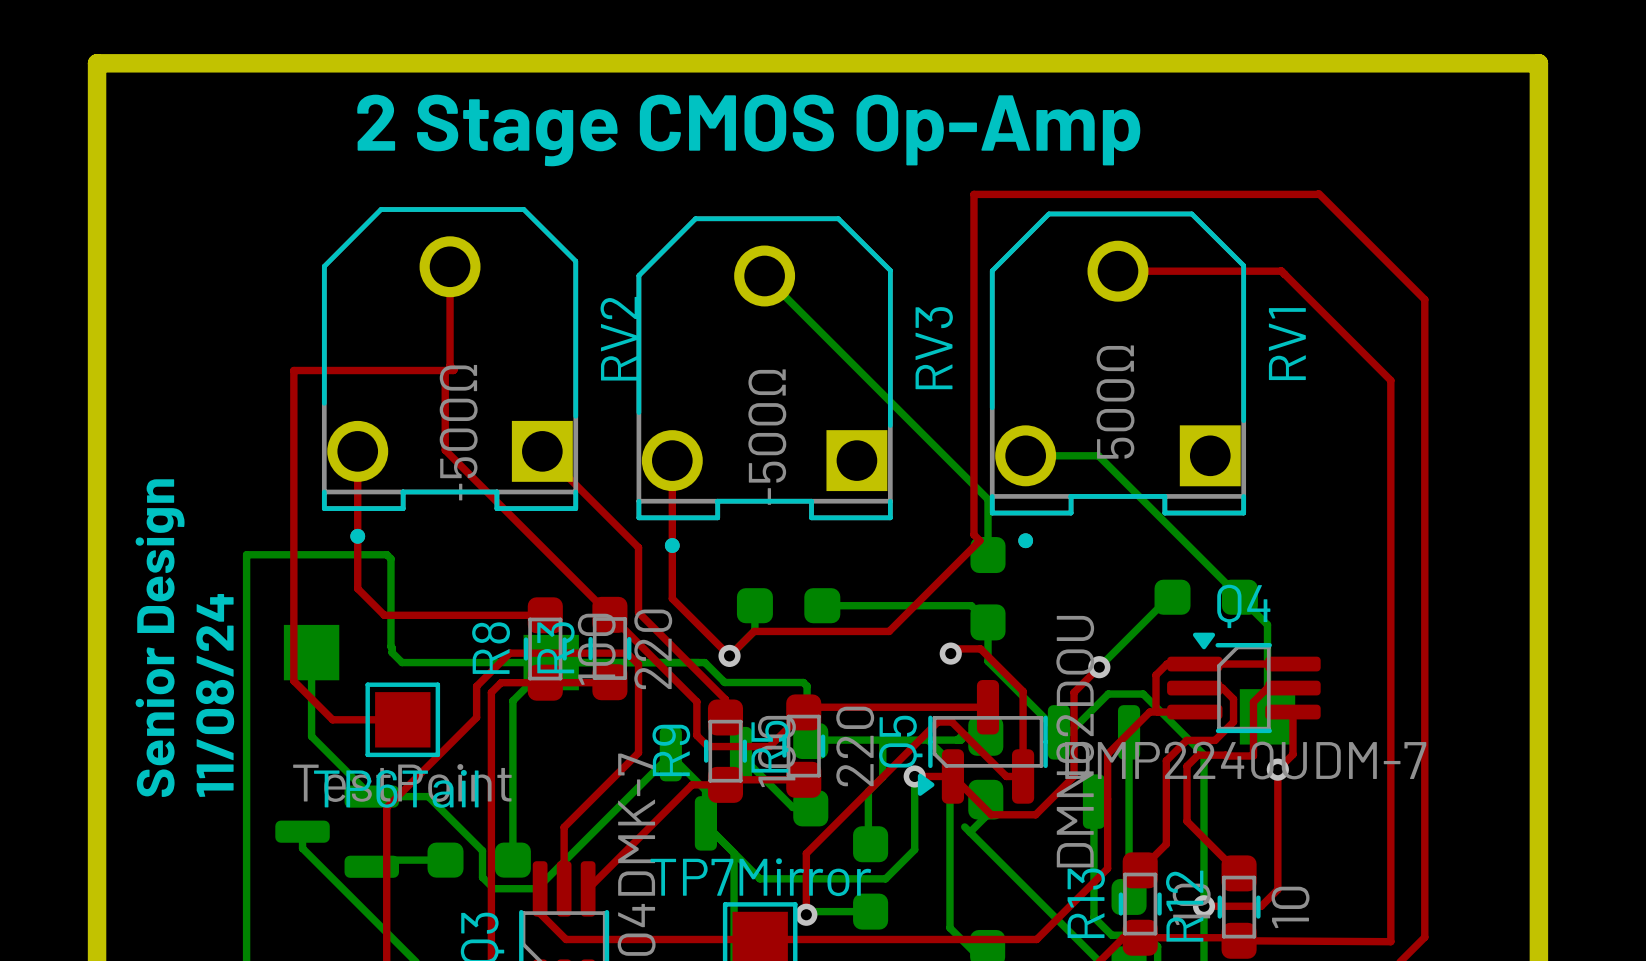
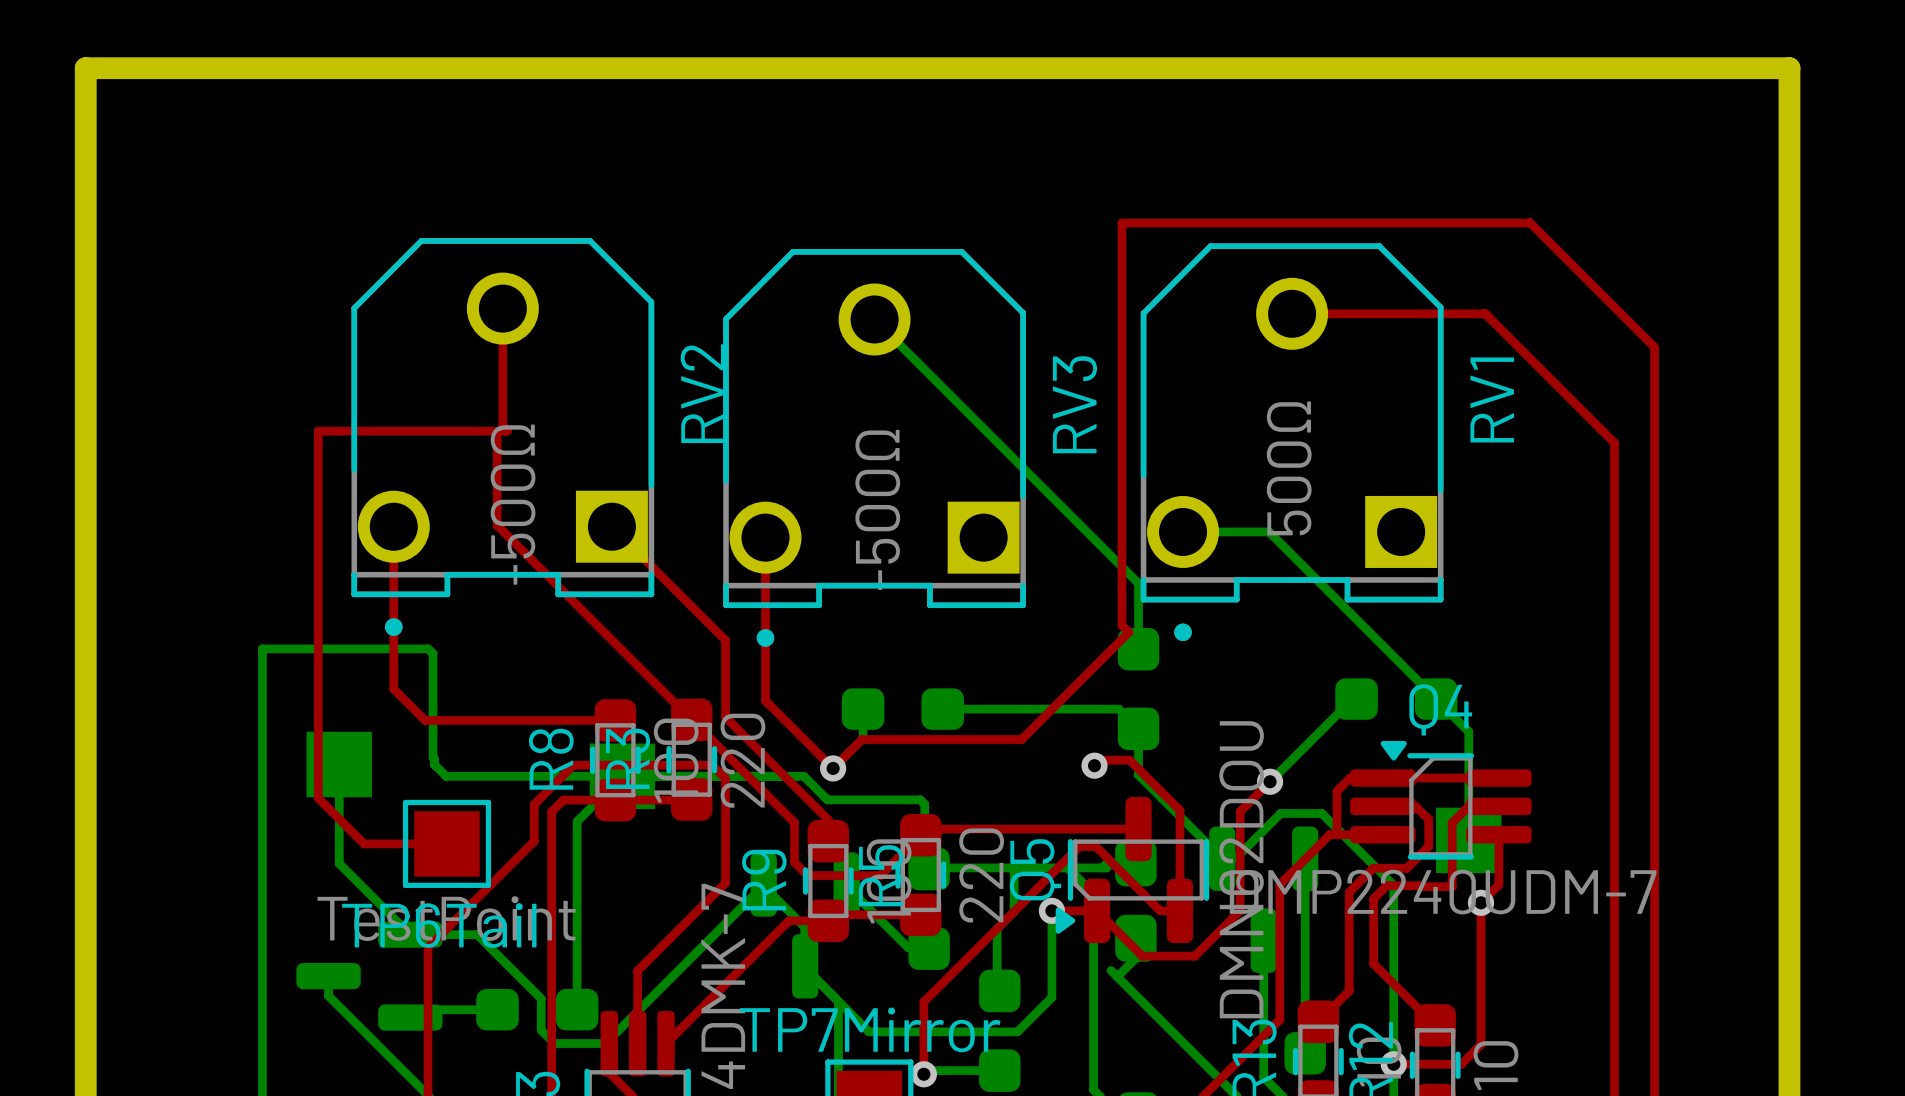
text: 2 Stage CMOS Op-Amp (748, 130) -> none
text: Senior Design (160, 638) -> none
text: 11/08/24 (215, 695) -> none

